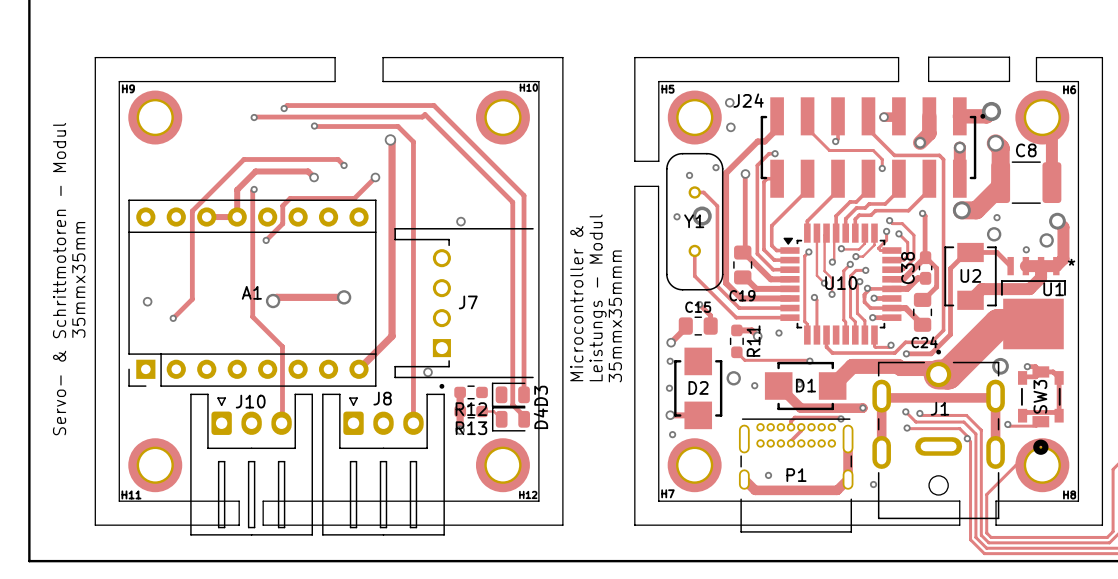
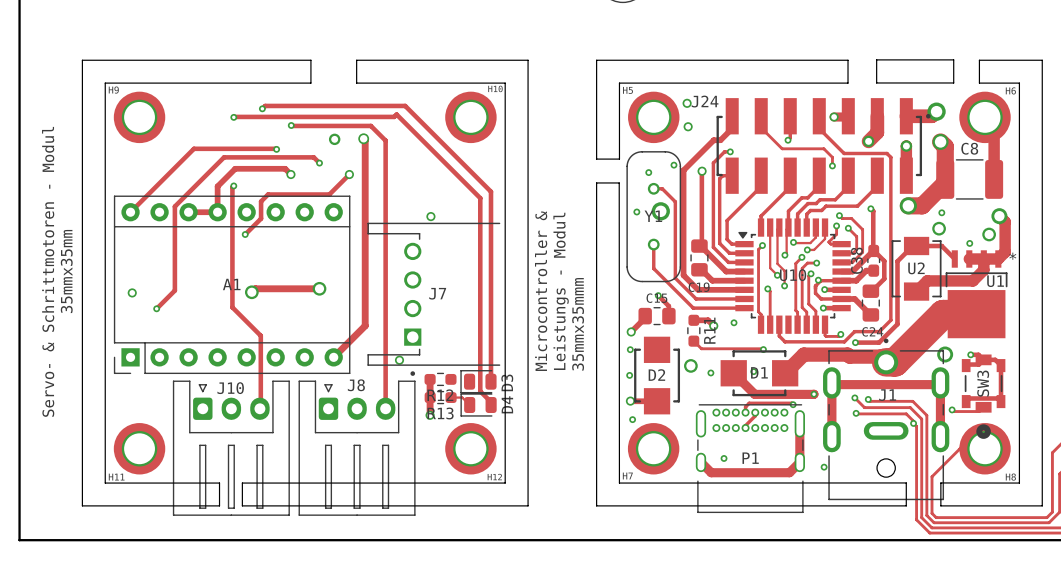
via: none -> (334, 139)
track: none -> (276, 149) (193, 148) (130, 212)
via: none -> (276, 149)

